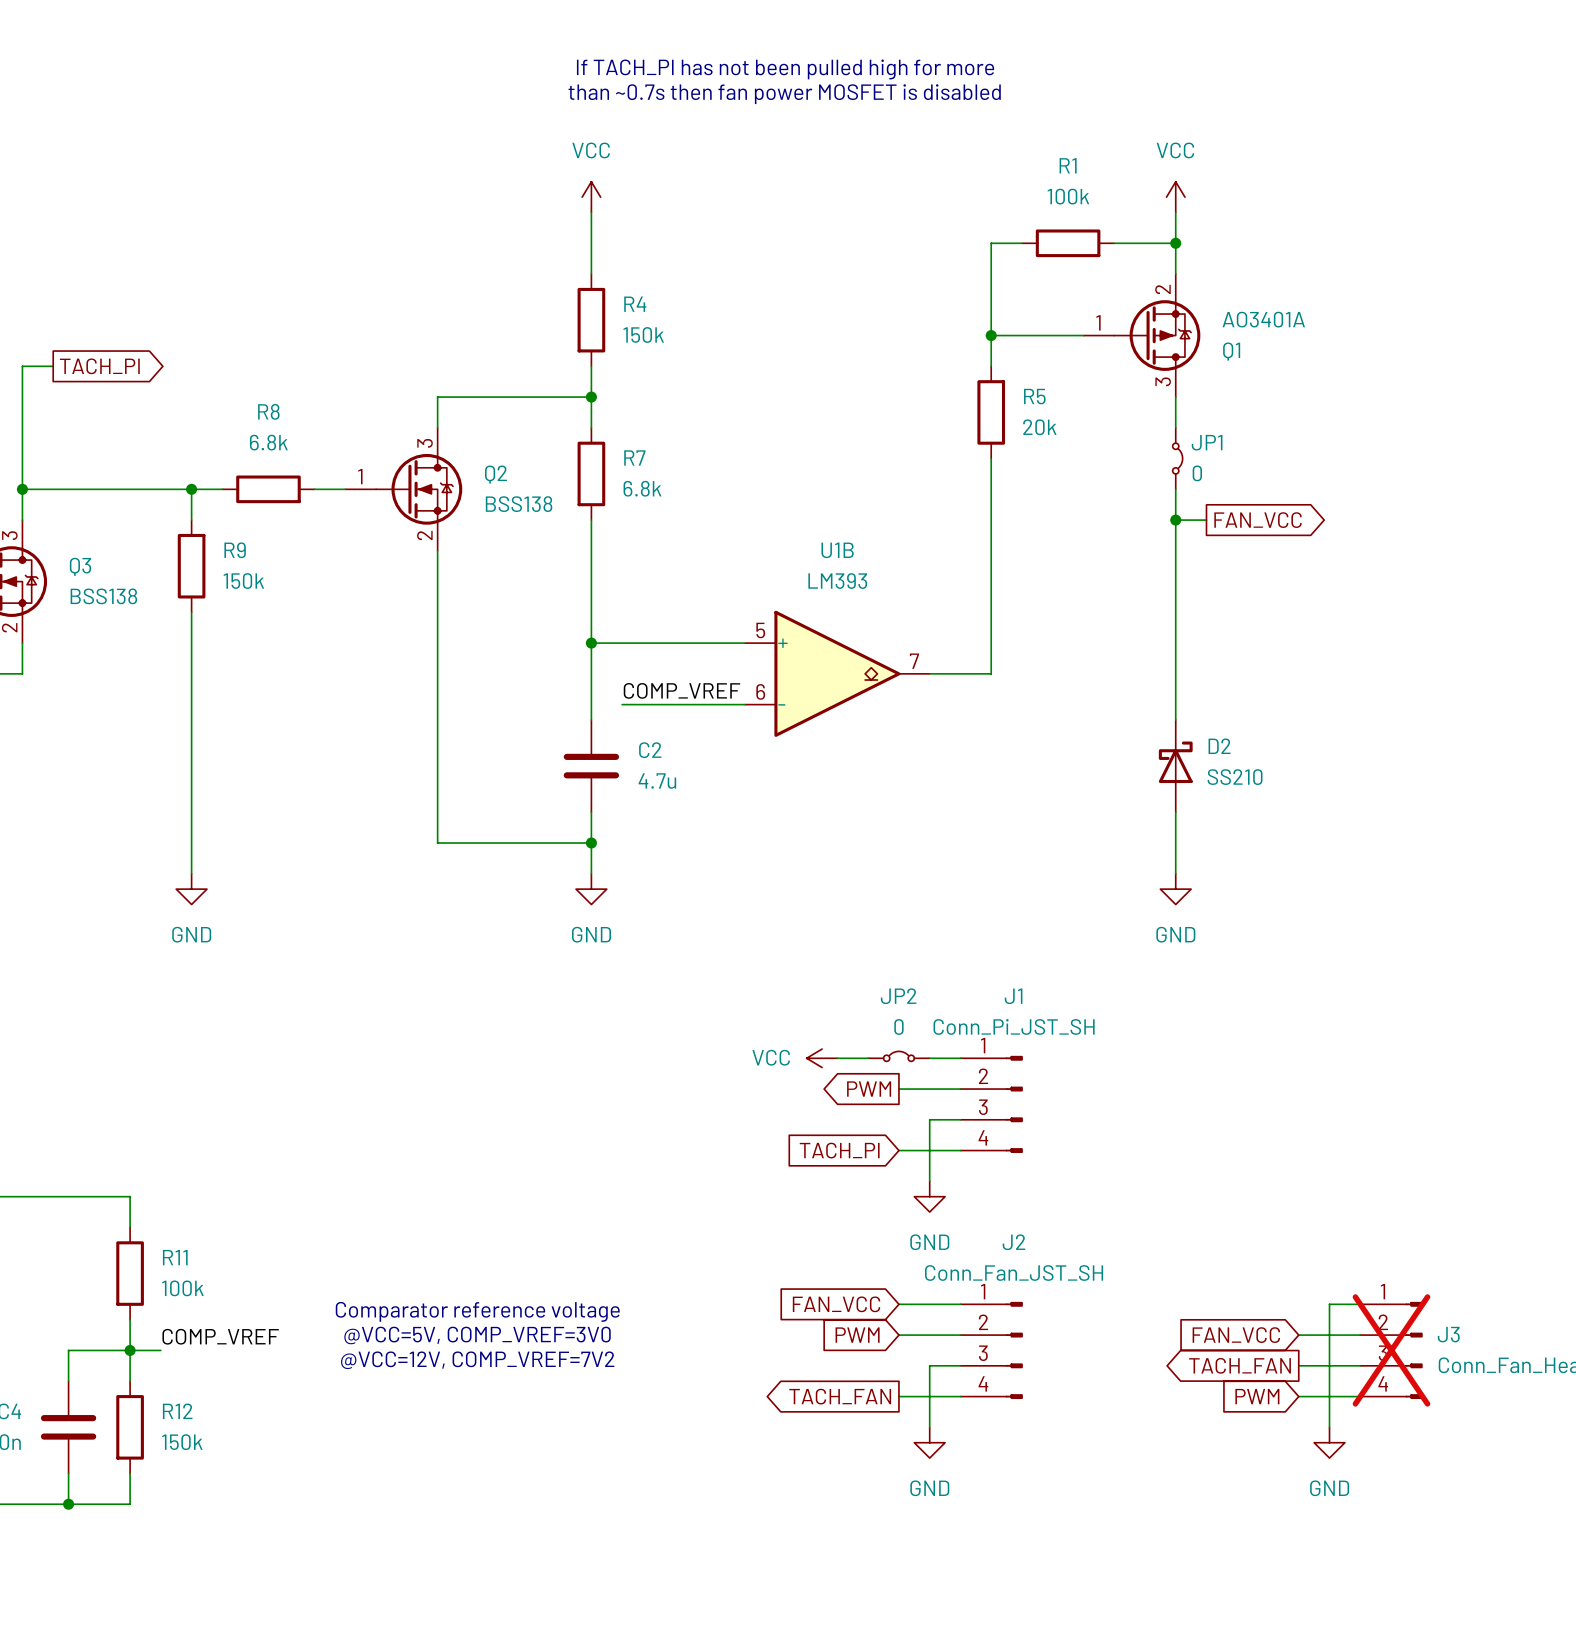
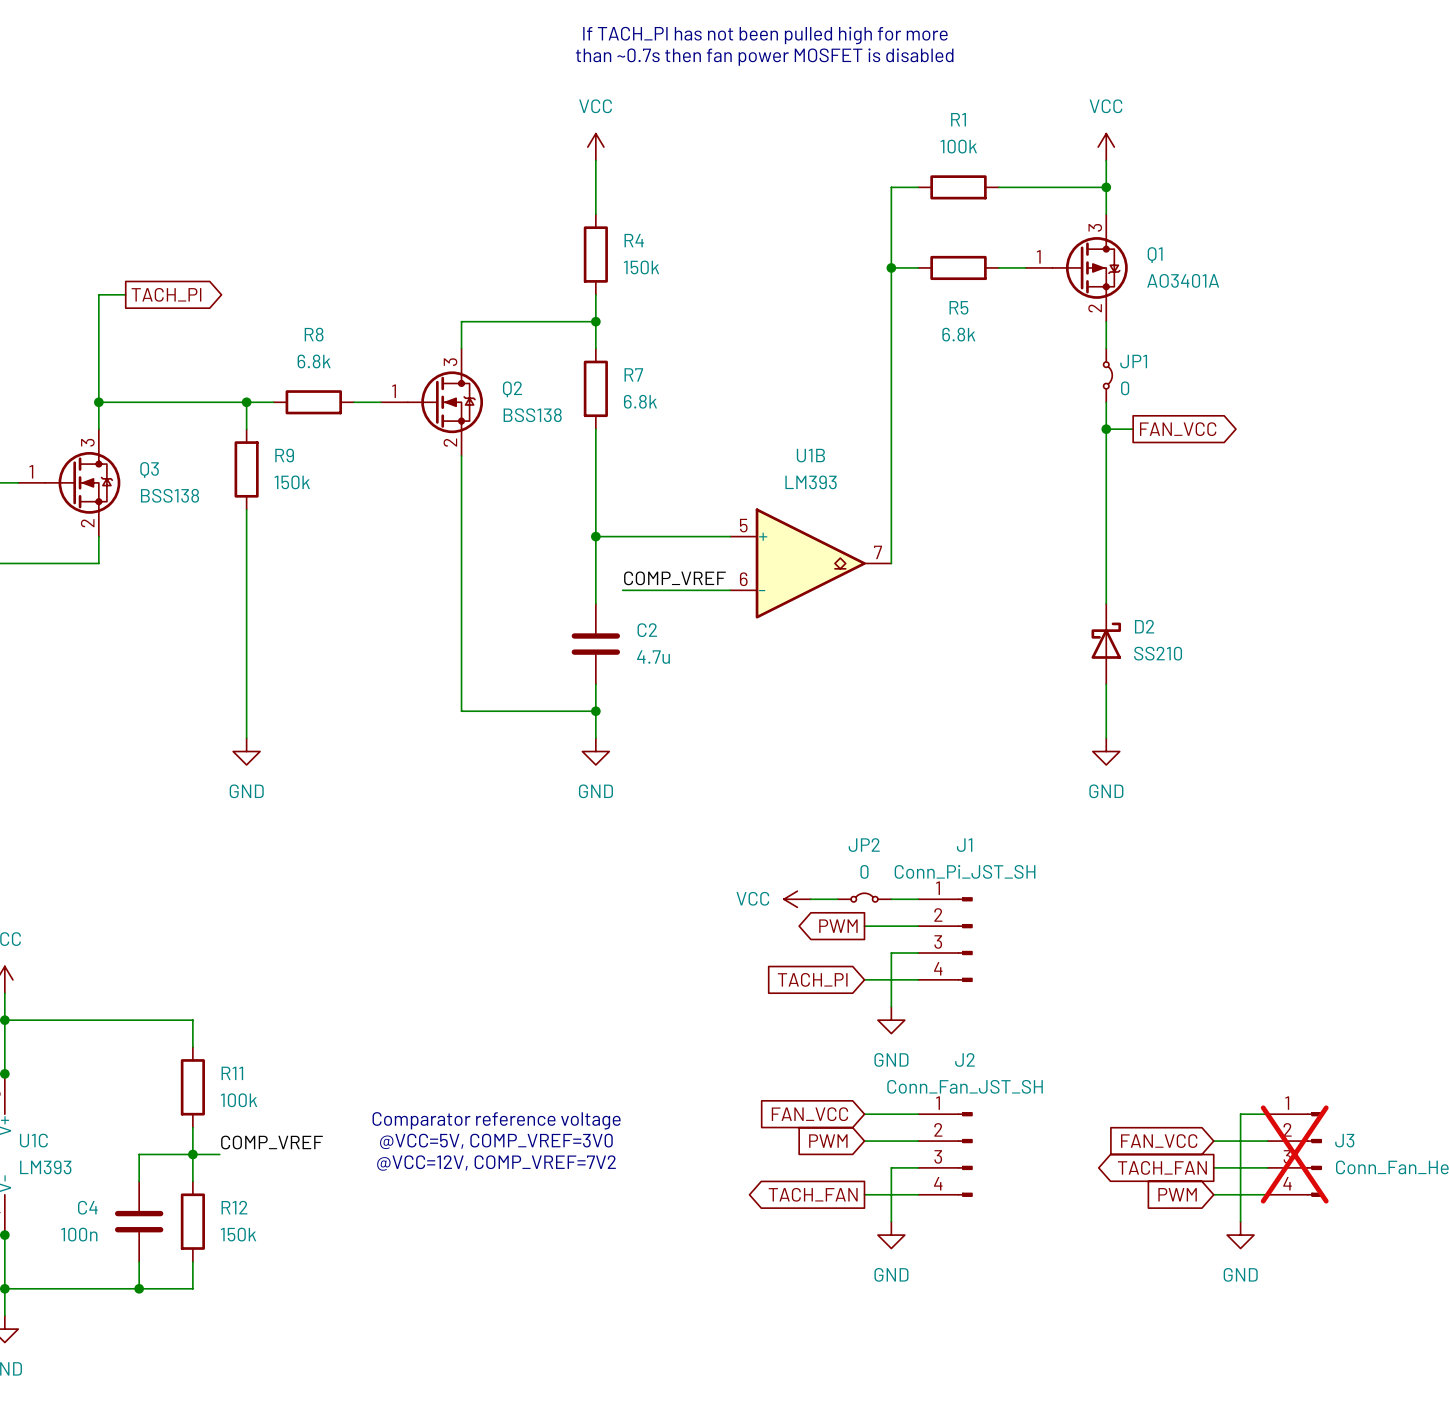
wire: (1021, 243) (991, 243) (991, 366) -> none
R1 position: (1068, 243) -> (958, 187)
wire: none -> (891, 267) (918, 267)
wire: (991, 335) (1052, 335) -> (998, 187) (1052, 187)
junction position: (991, 335) -> (891, 267)
Q1 flip: as is (1157, 335) -> up-down (1090, 267)
R5 rotation: 0° (991, 412) -> 90° clockwise (958, 267)
R5 position: (991, 412) -> (958, 267)
R5 value: 20k (1039, 427) -> 6.8k (958, 334)
wire: (991, 458) (991, 673) (929, 673) -> (918, 187) (891, 187) (891, 563)

